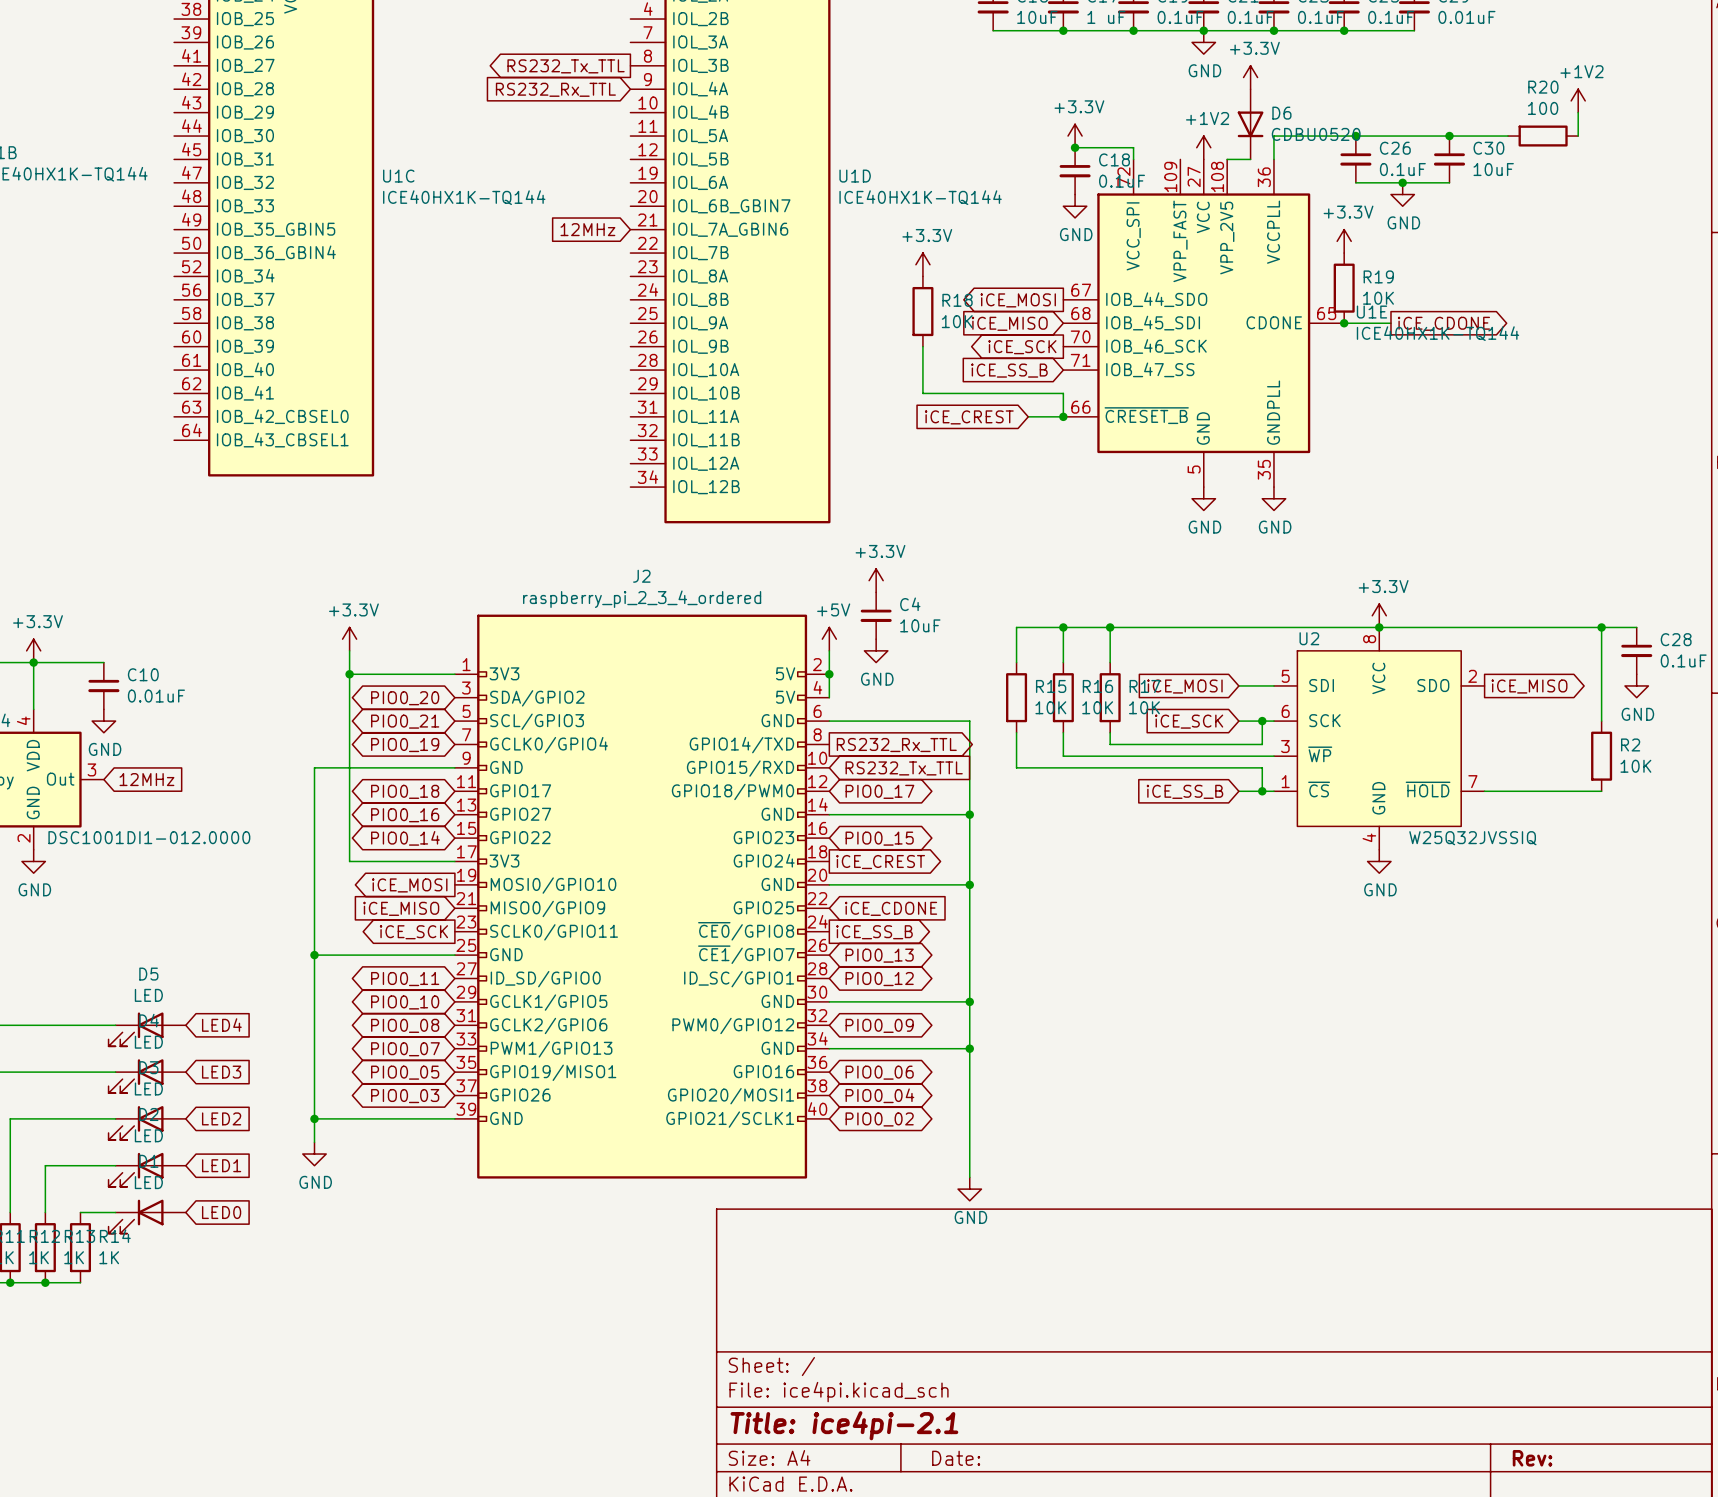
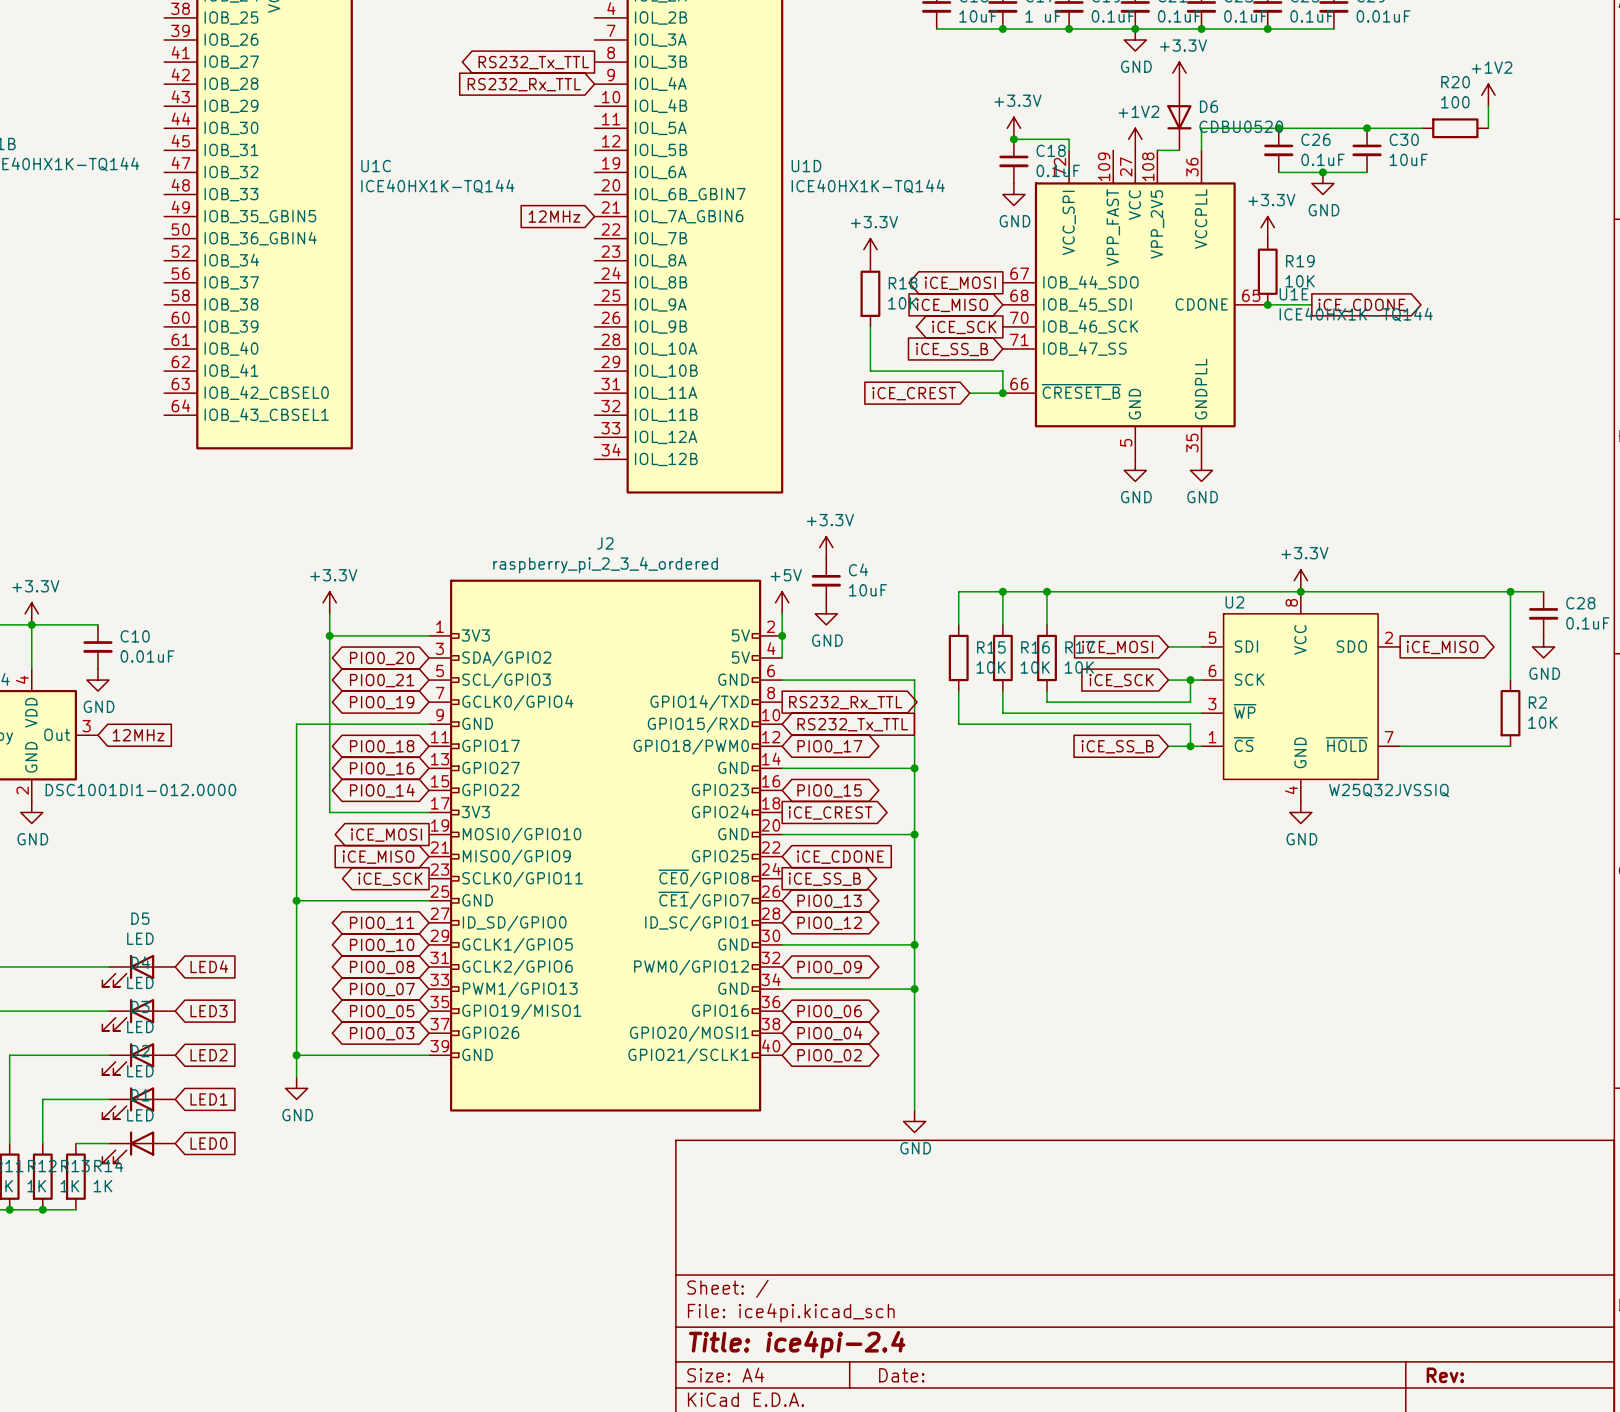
title block: Title: ice4pi-2.1 (844, 1425) -> Title: ice4pi-2.4 (797, 1344)

